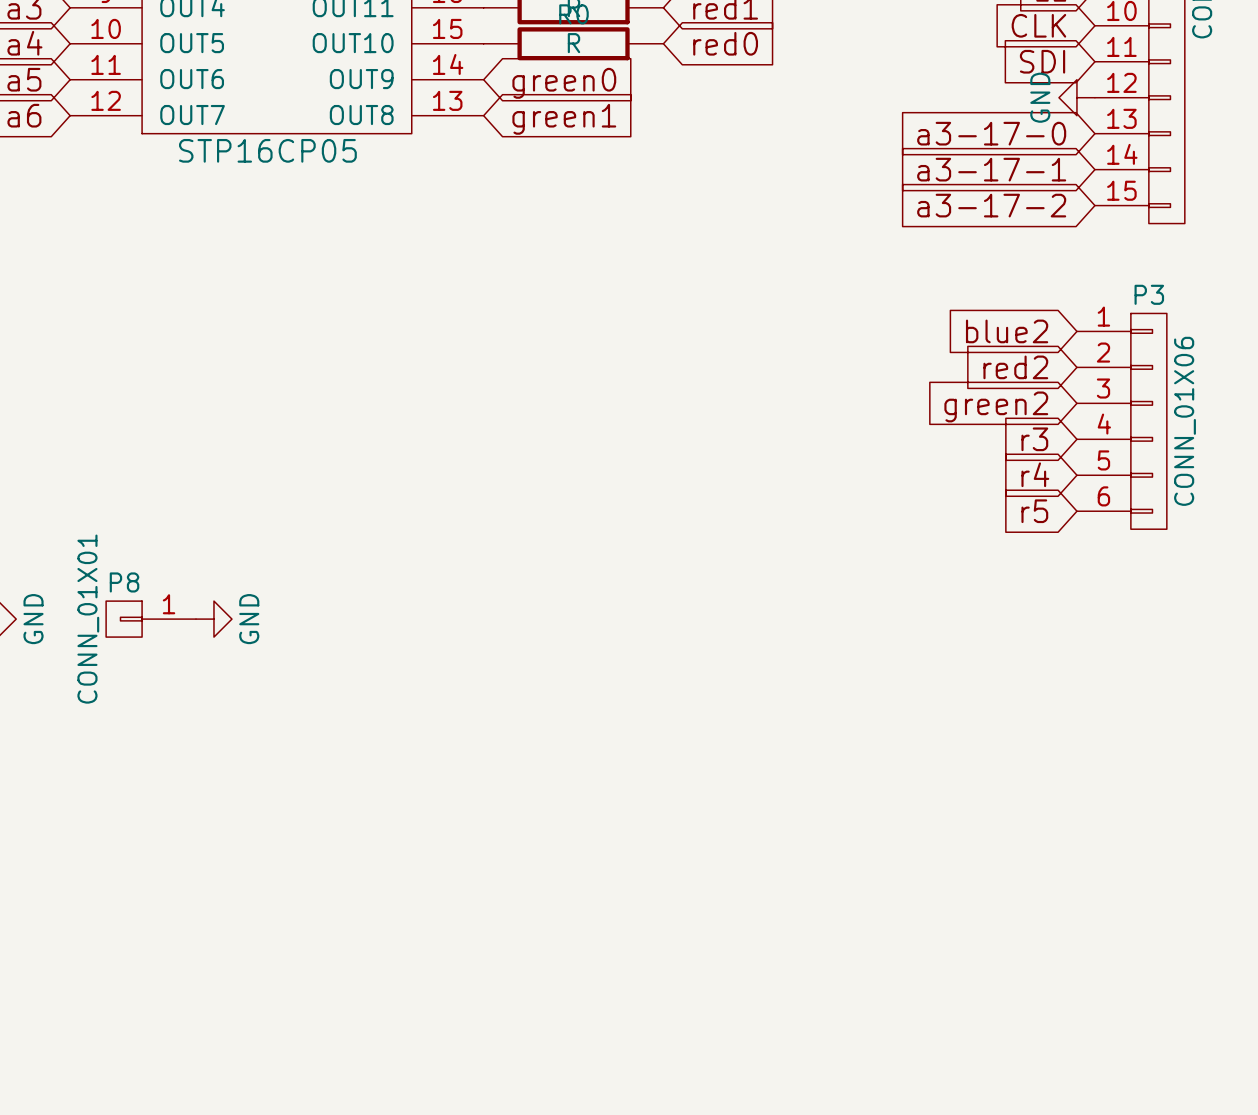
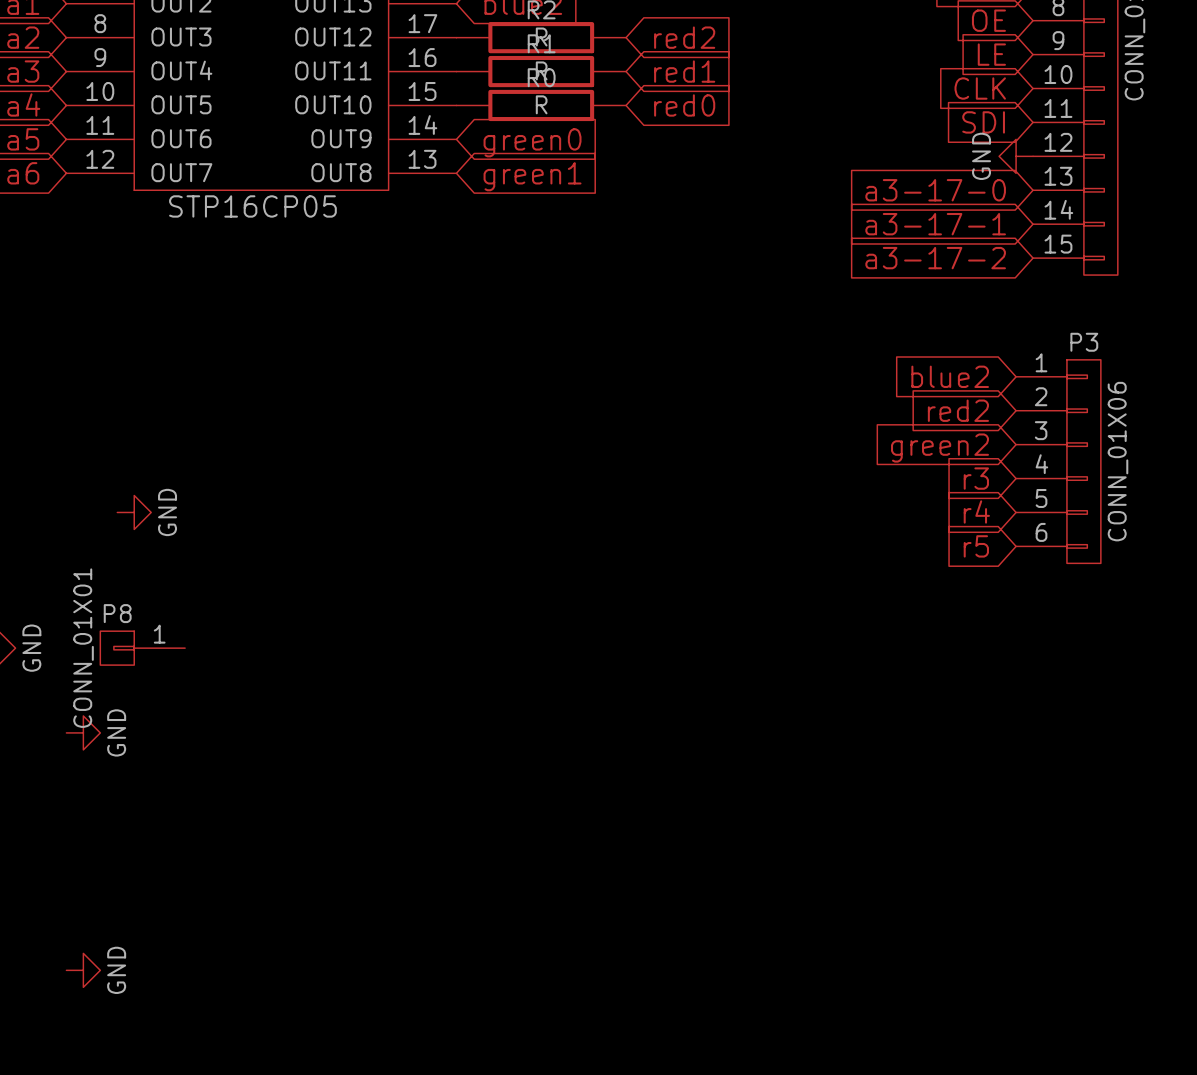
power symbol: none -> GND (134, 512)
power symbol: GND (213, 619) -> none
power symbol: none -> GND (83, 732)
power symbol: none -> GND (83, 970)

